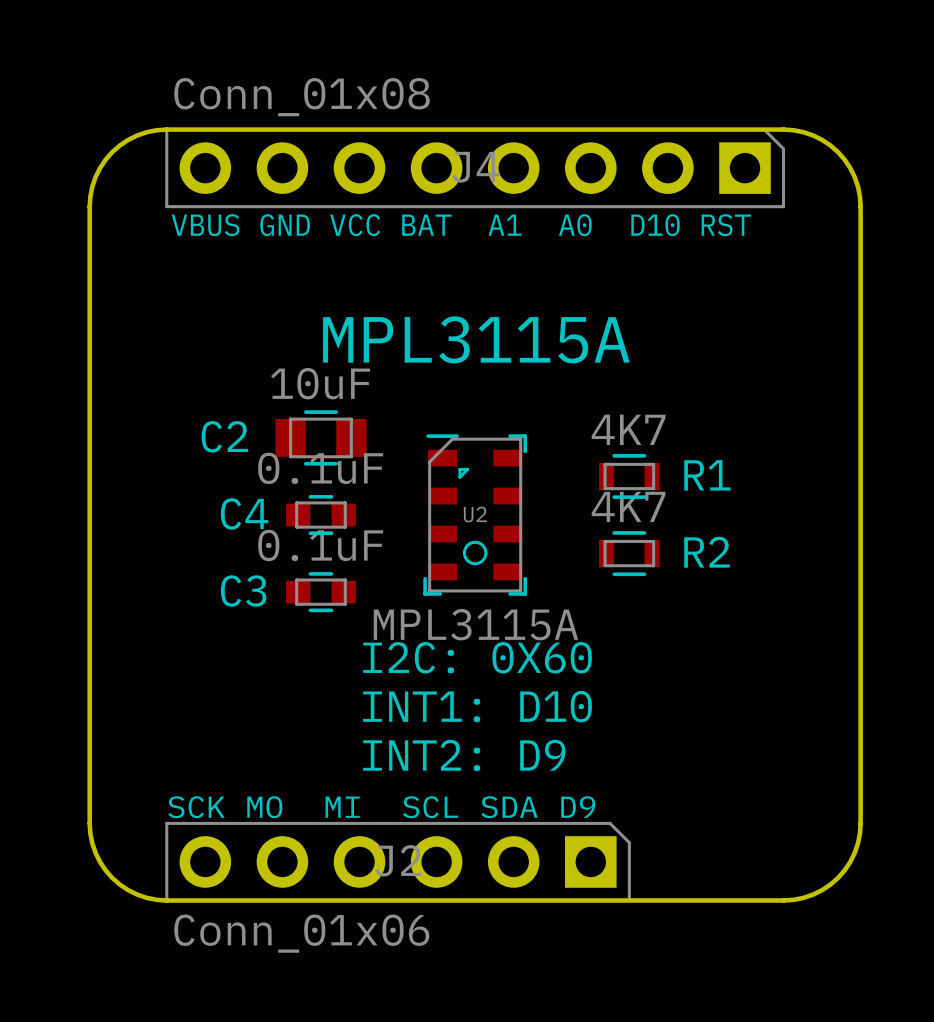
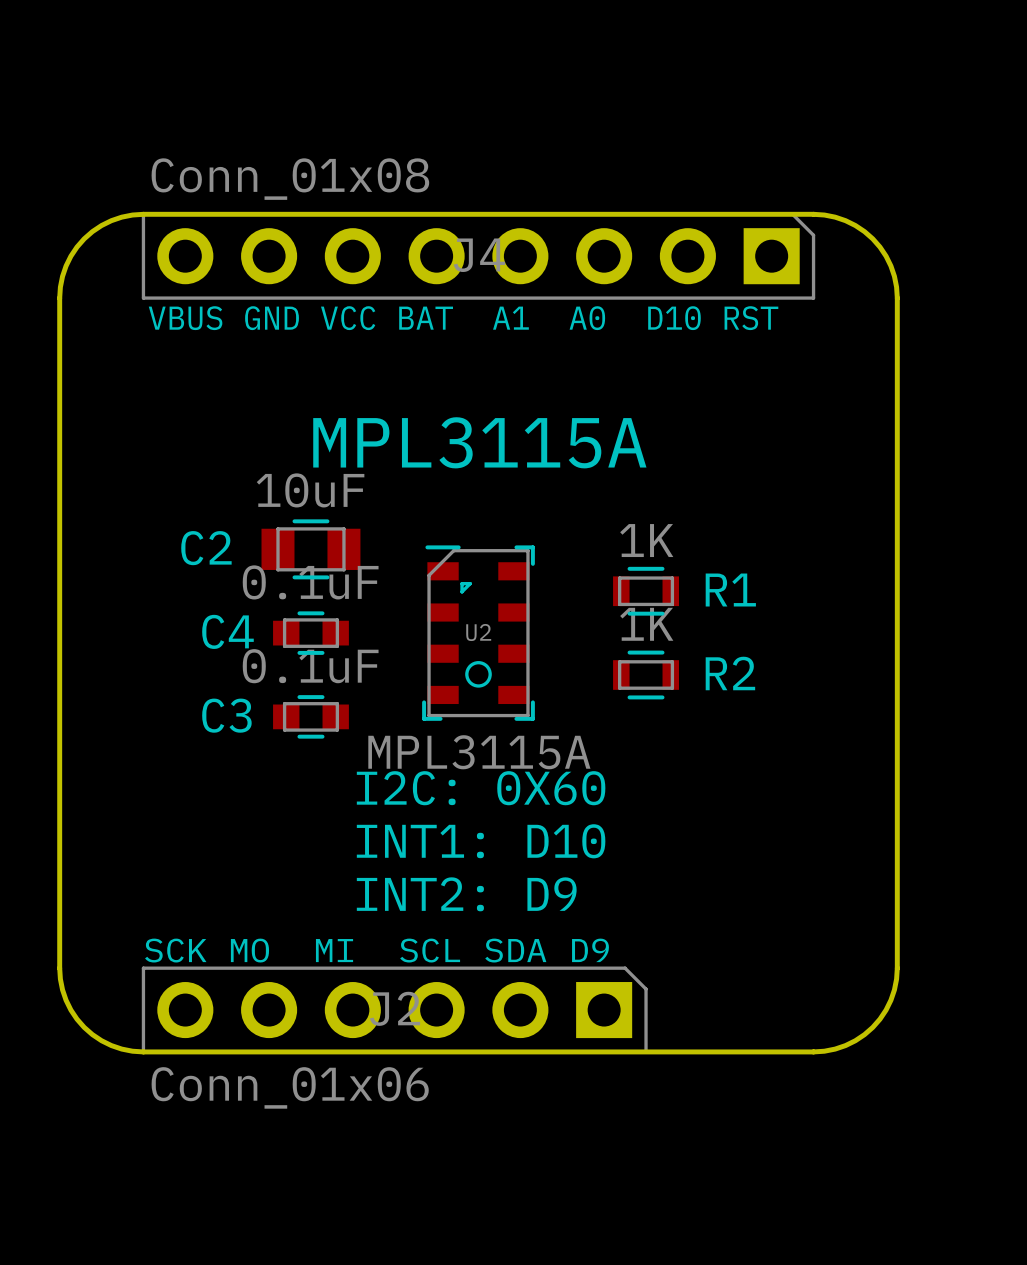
R1 value: 4K7 (628, 429) -> 1K (646, 540)
R2 value: 4K7 (628, 506) -> 1K (646, 624)

